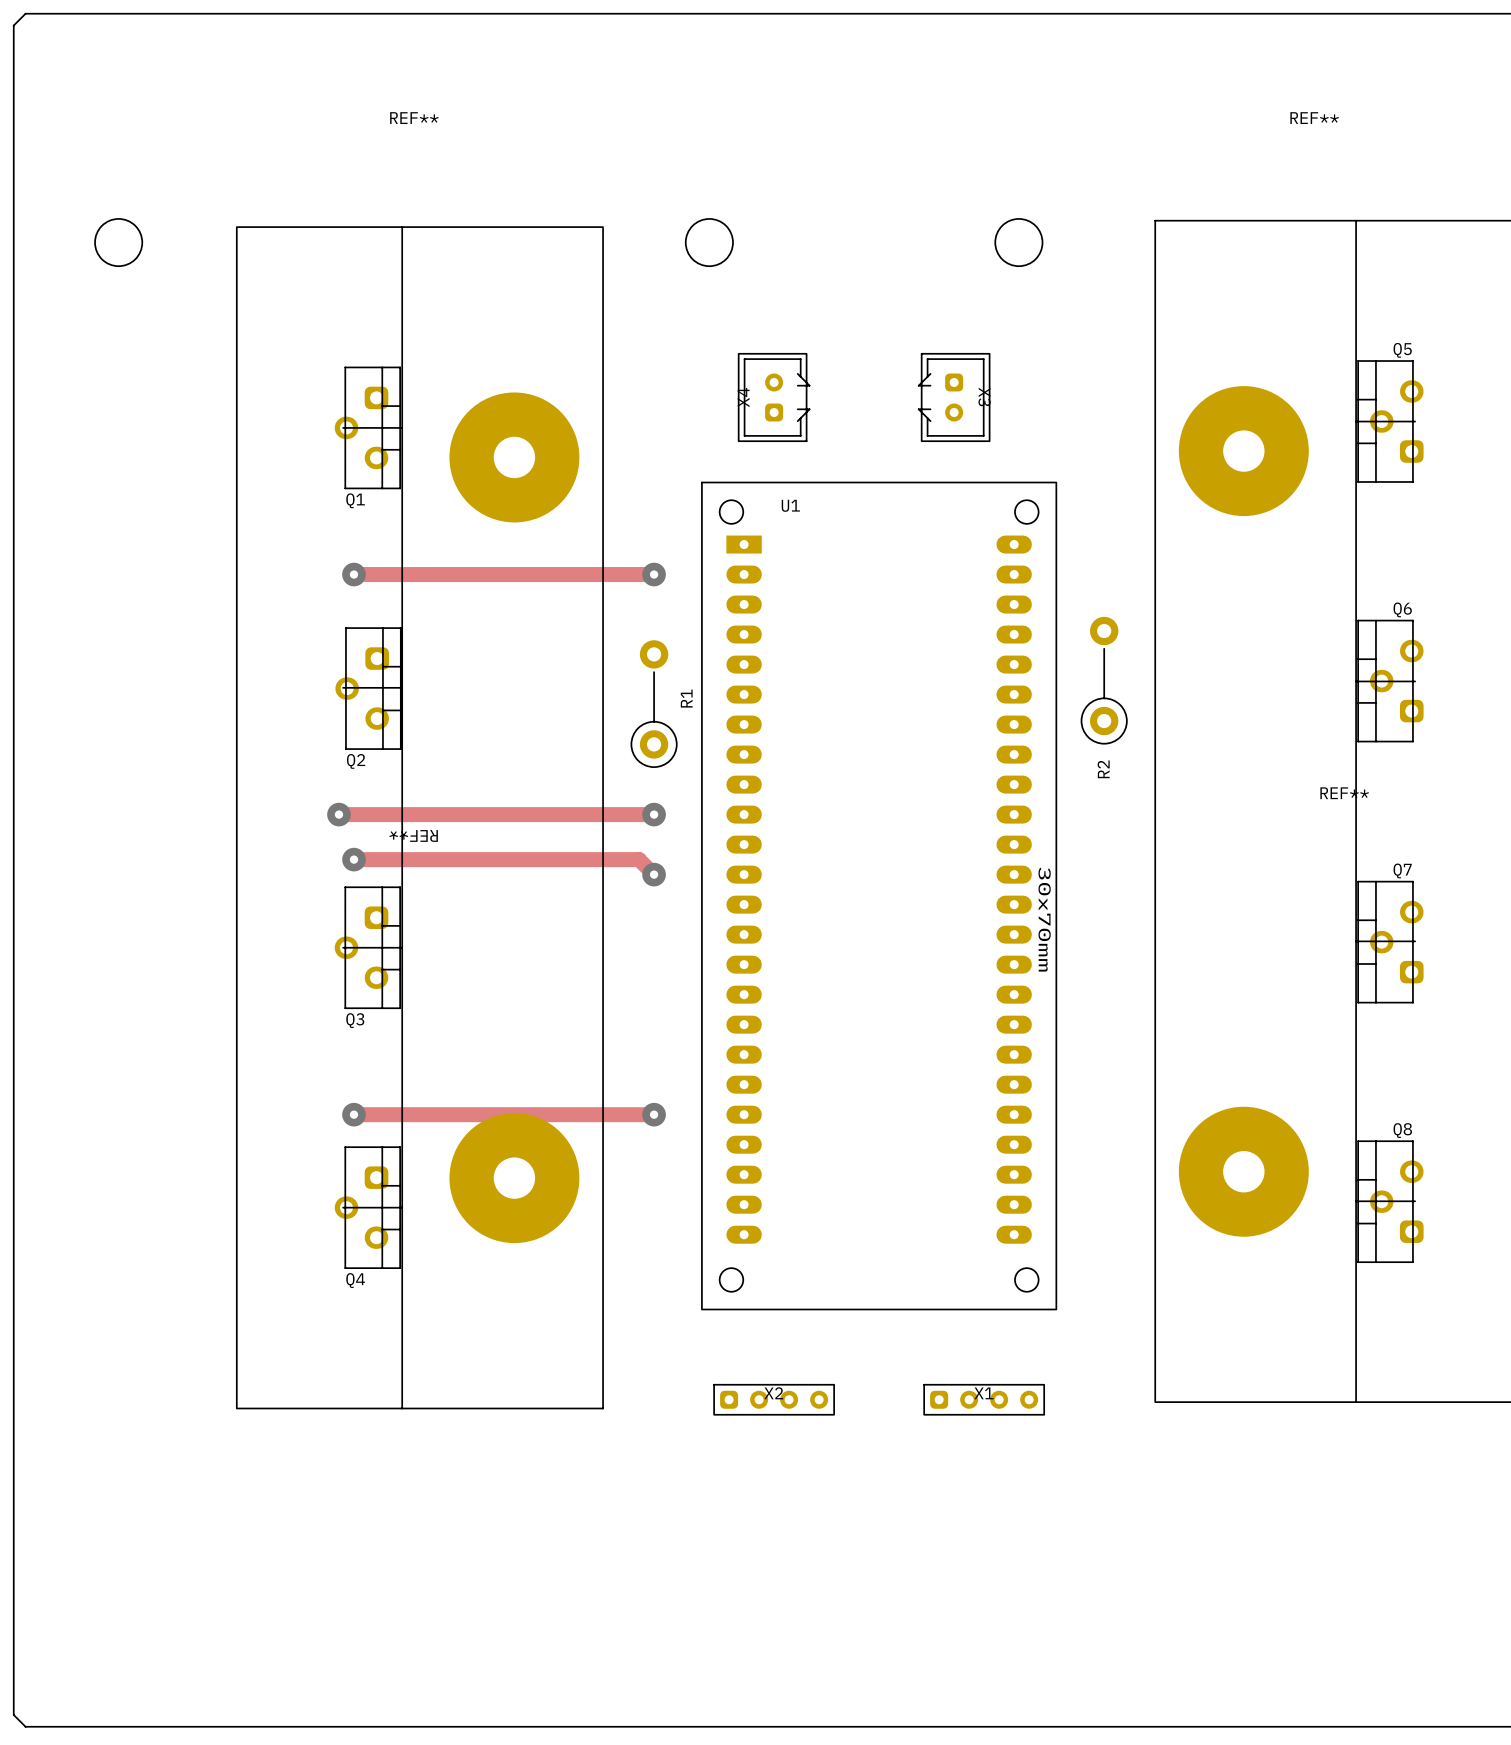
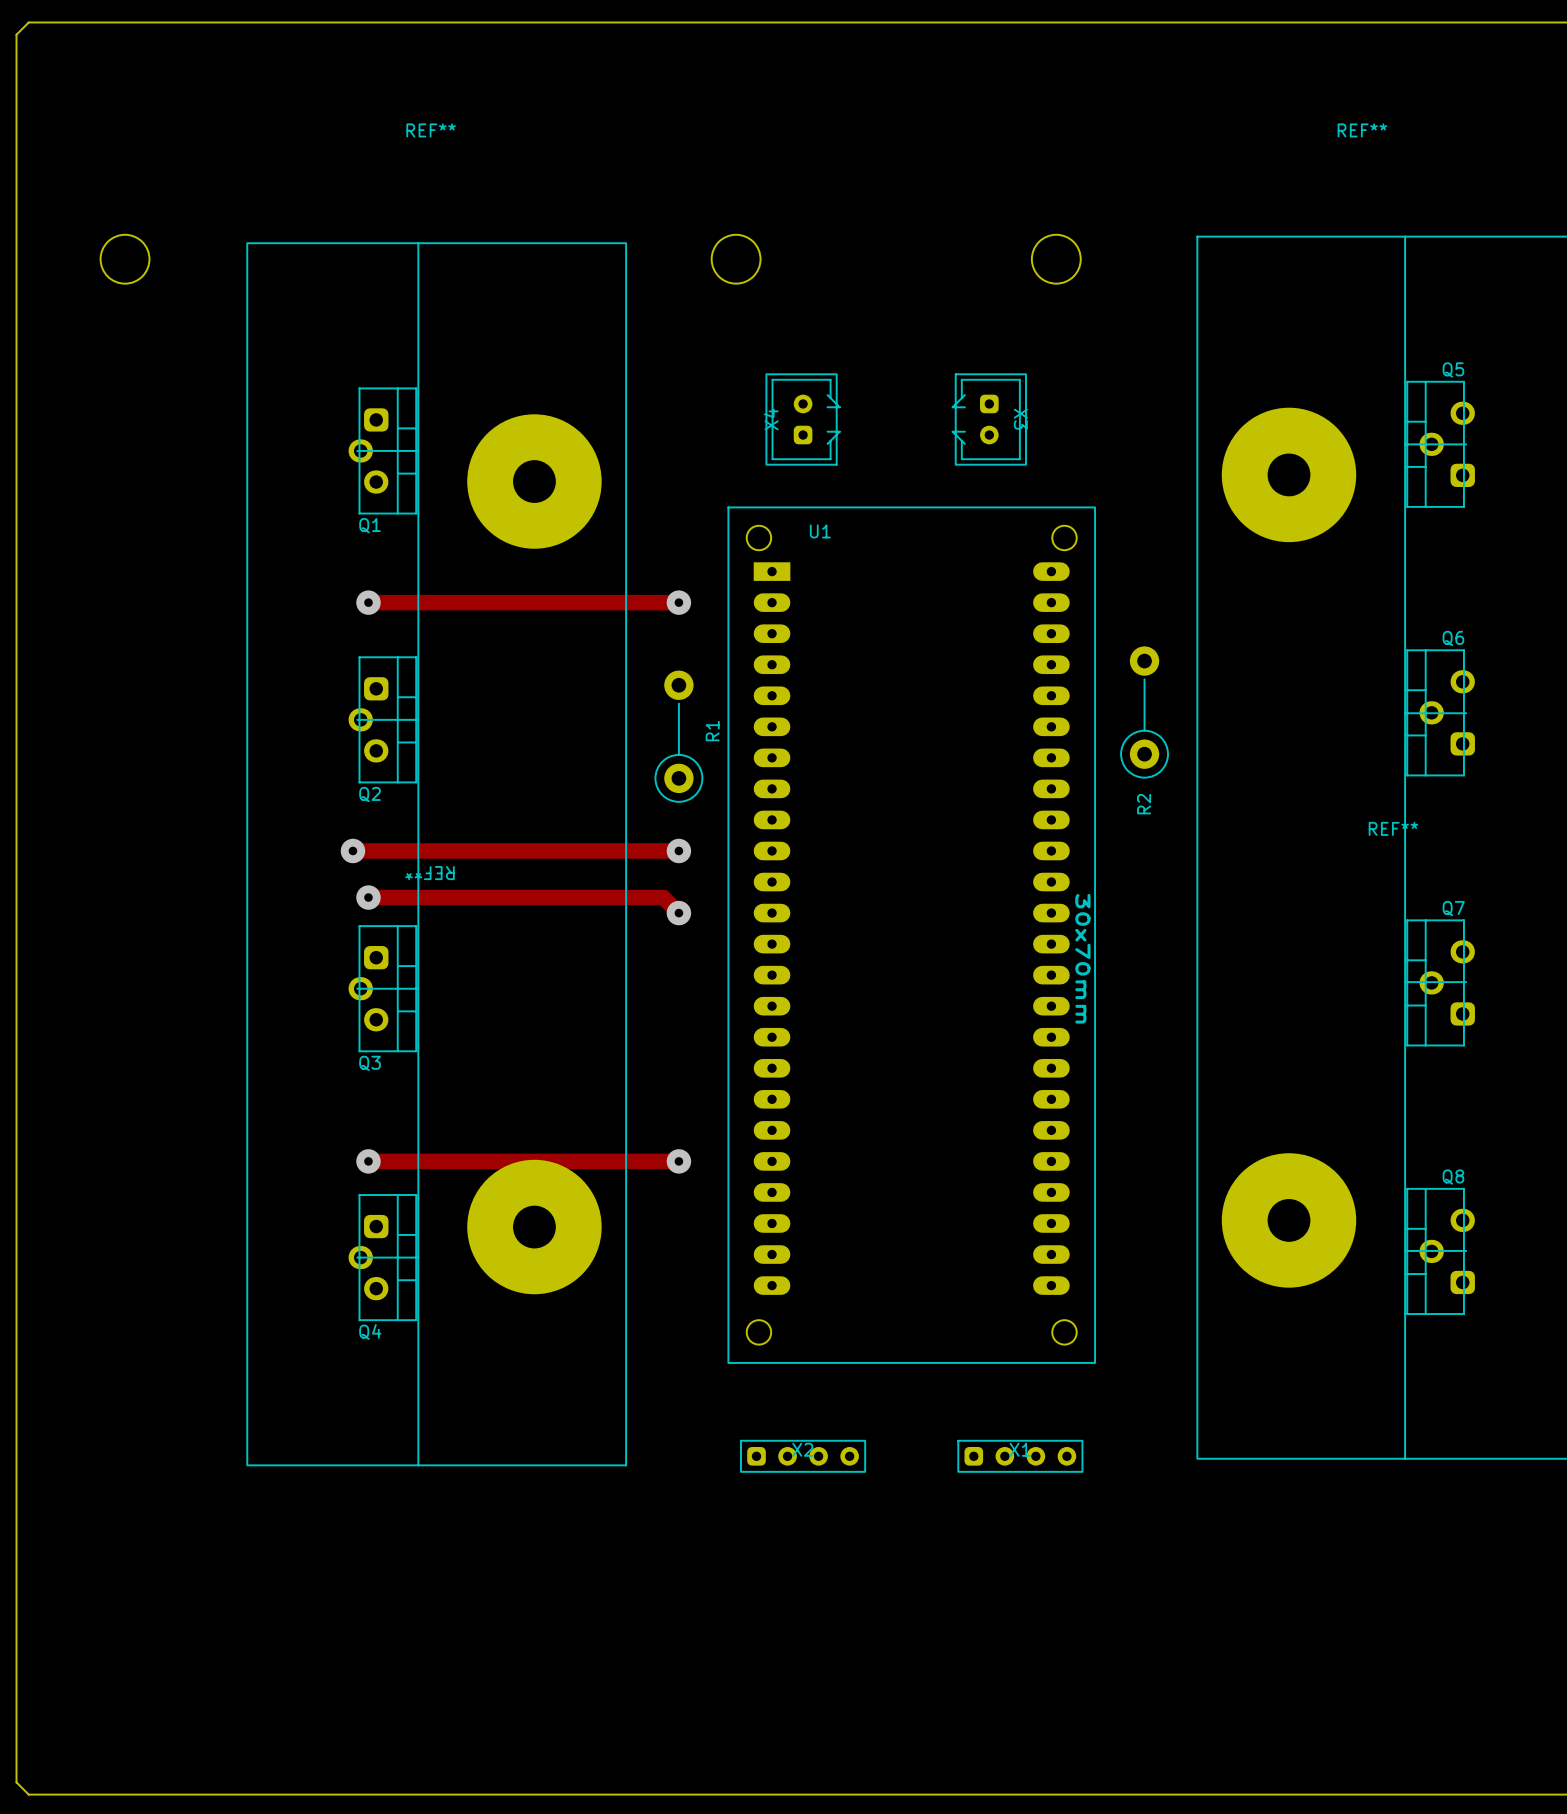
Q1 footprint: [334, 366, 401, 490] -> [348, 387, 417, 515]
Q2 footprint: [335, 627, 402, 750] -> [348, 656, 417, 784]
Q3 footprint: [334, 886, 401, 1009] -> [348, 925, 417, 1053]
Q4 footprint: [334, 1146, 401, 1269] -> [348, 1194, 417, 1321]

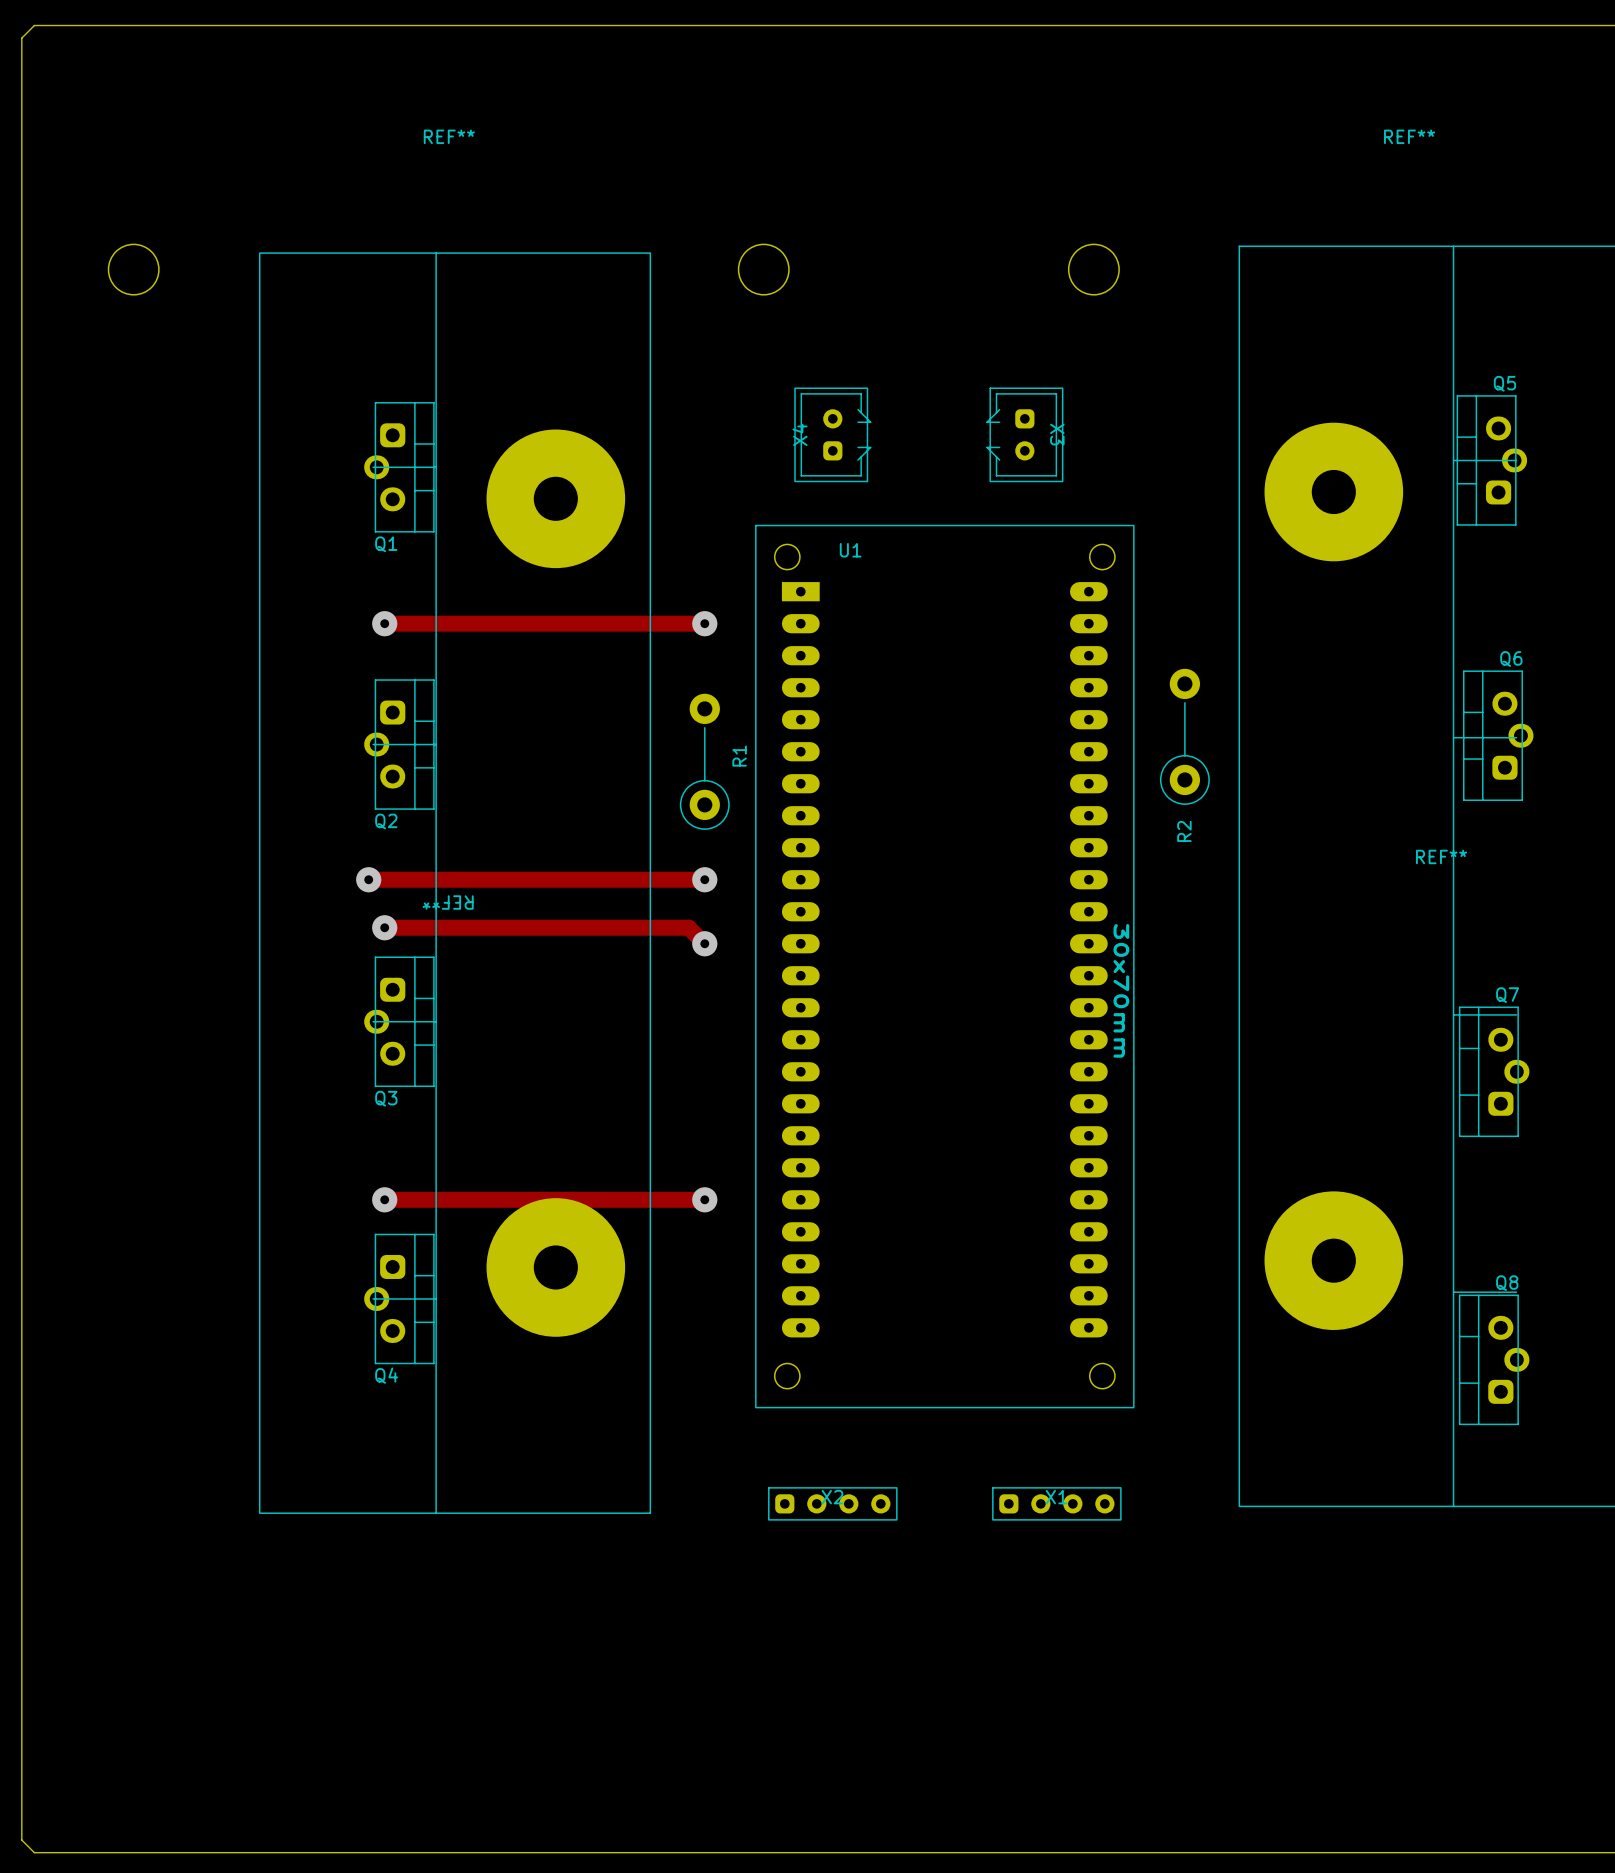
Q5 footprint: [1406, 381, 1475, 508] -> [1456, 395, 1528, 526]
Q6 footprint: [1406, 649, 1475, 777] -> [1462, 670, 1534, 801]
Q7 footprint: [1406, 919, 1475, 1047] -> [1458, 1006, 1530, 1138]
Q8 footprint: [1406, 1188, 1475, 1315] -> [1458, 1294, 1530, 1426]

